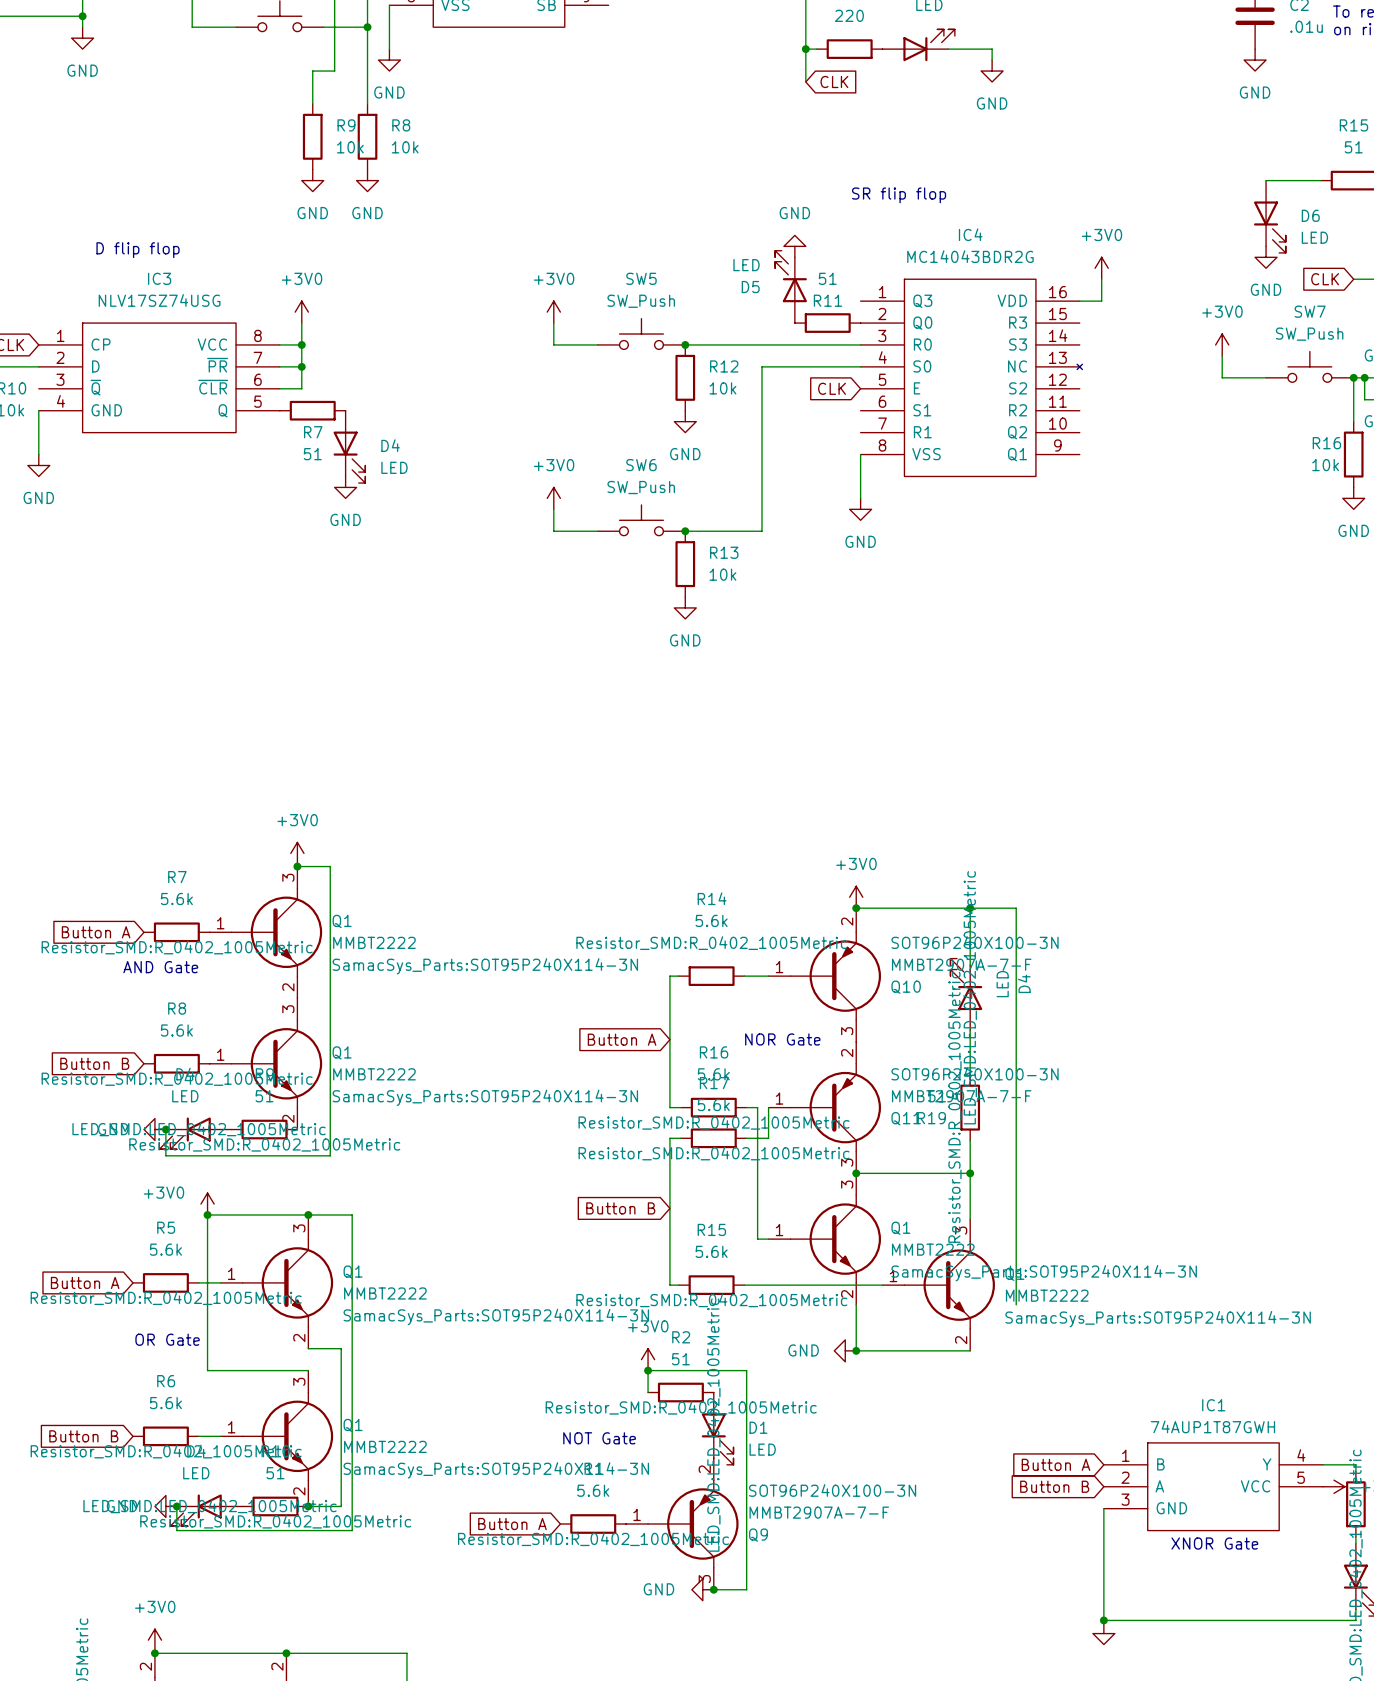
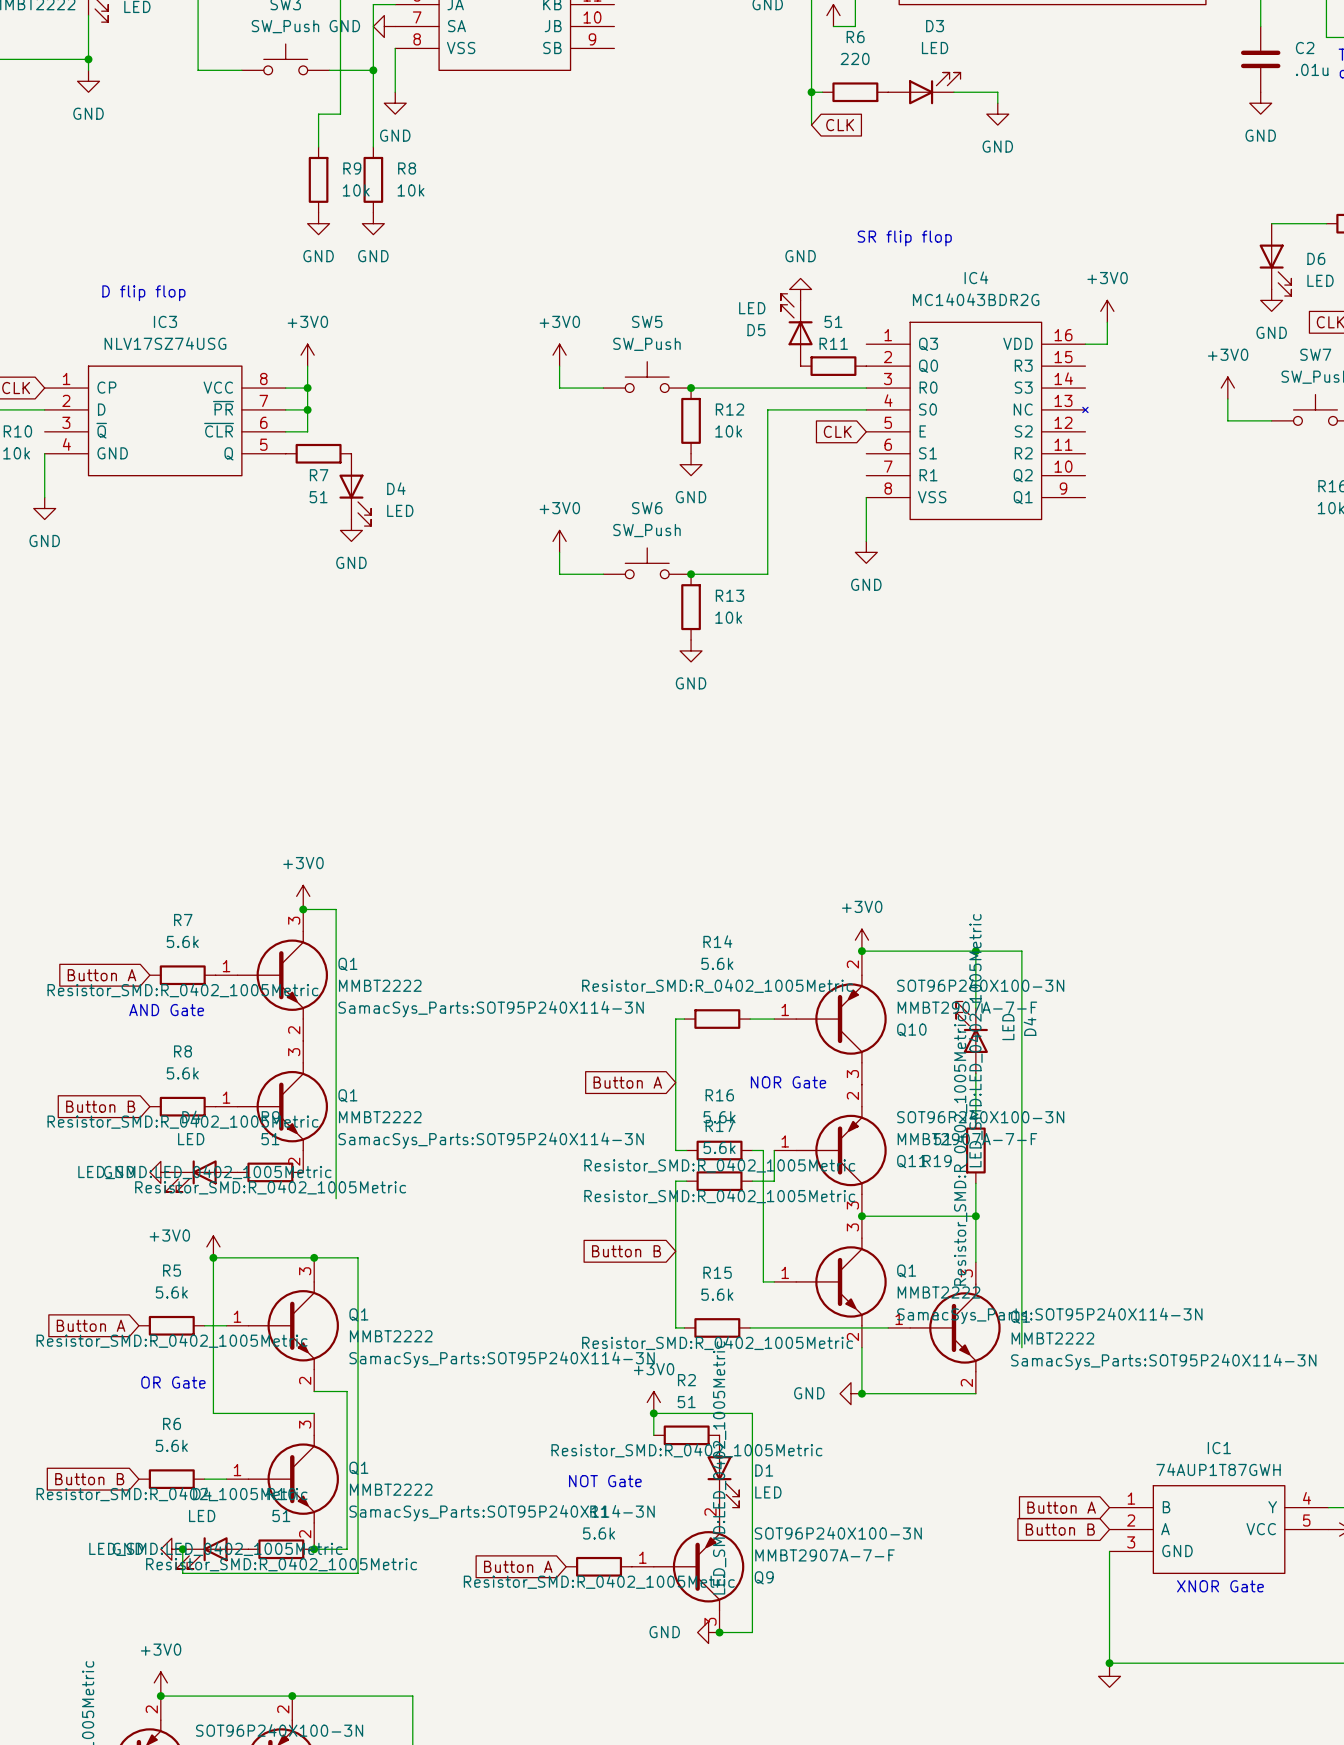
wire: (165, 1129) (165, 1155) (330, 1155) -> none
junction: (165, 1129) -> none

